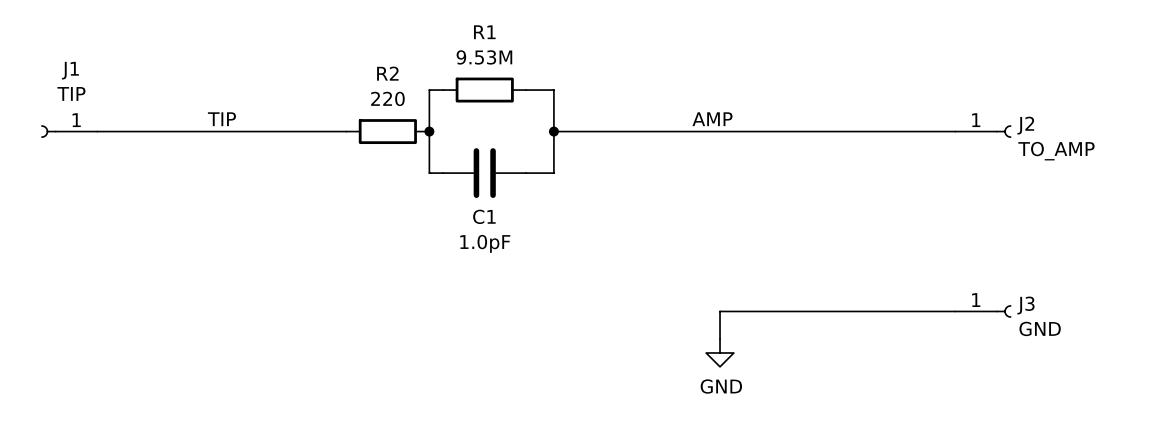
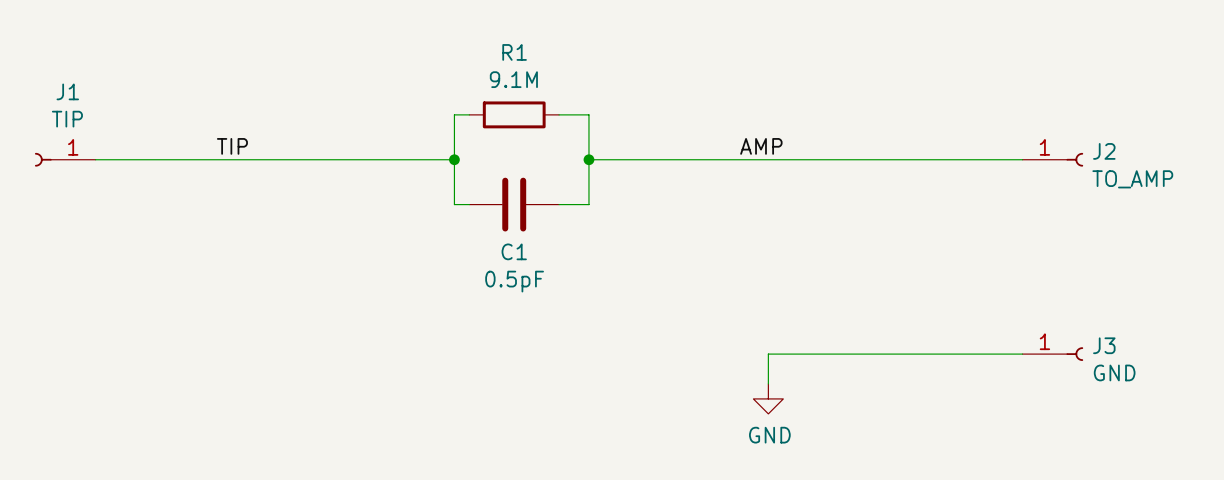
R1 value: 9.53M (484, 57) -> 9.1M (513, 79)
wire: none -> (364, 159) (454, 159)
R2: 220 (387, 131) -> none
C1 value: 1.0pF (485, 243) -> 0.5pF (514, 281)

